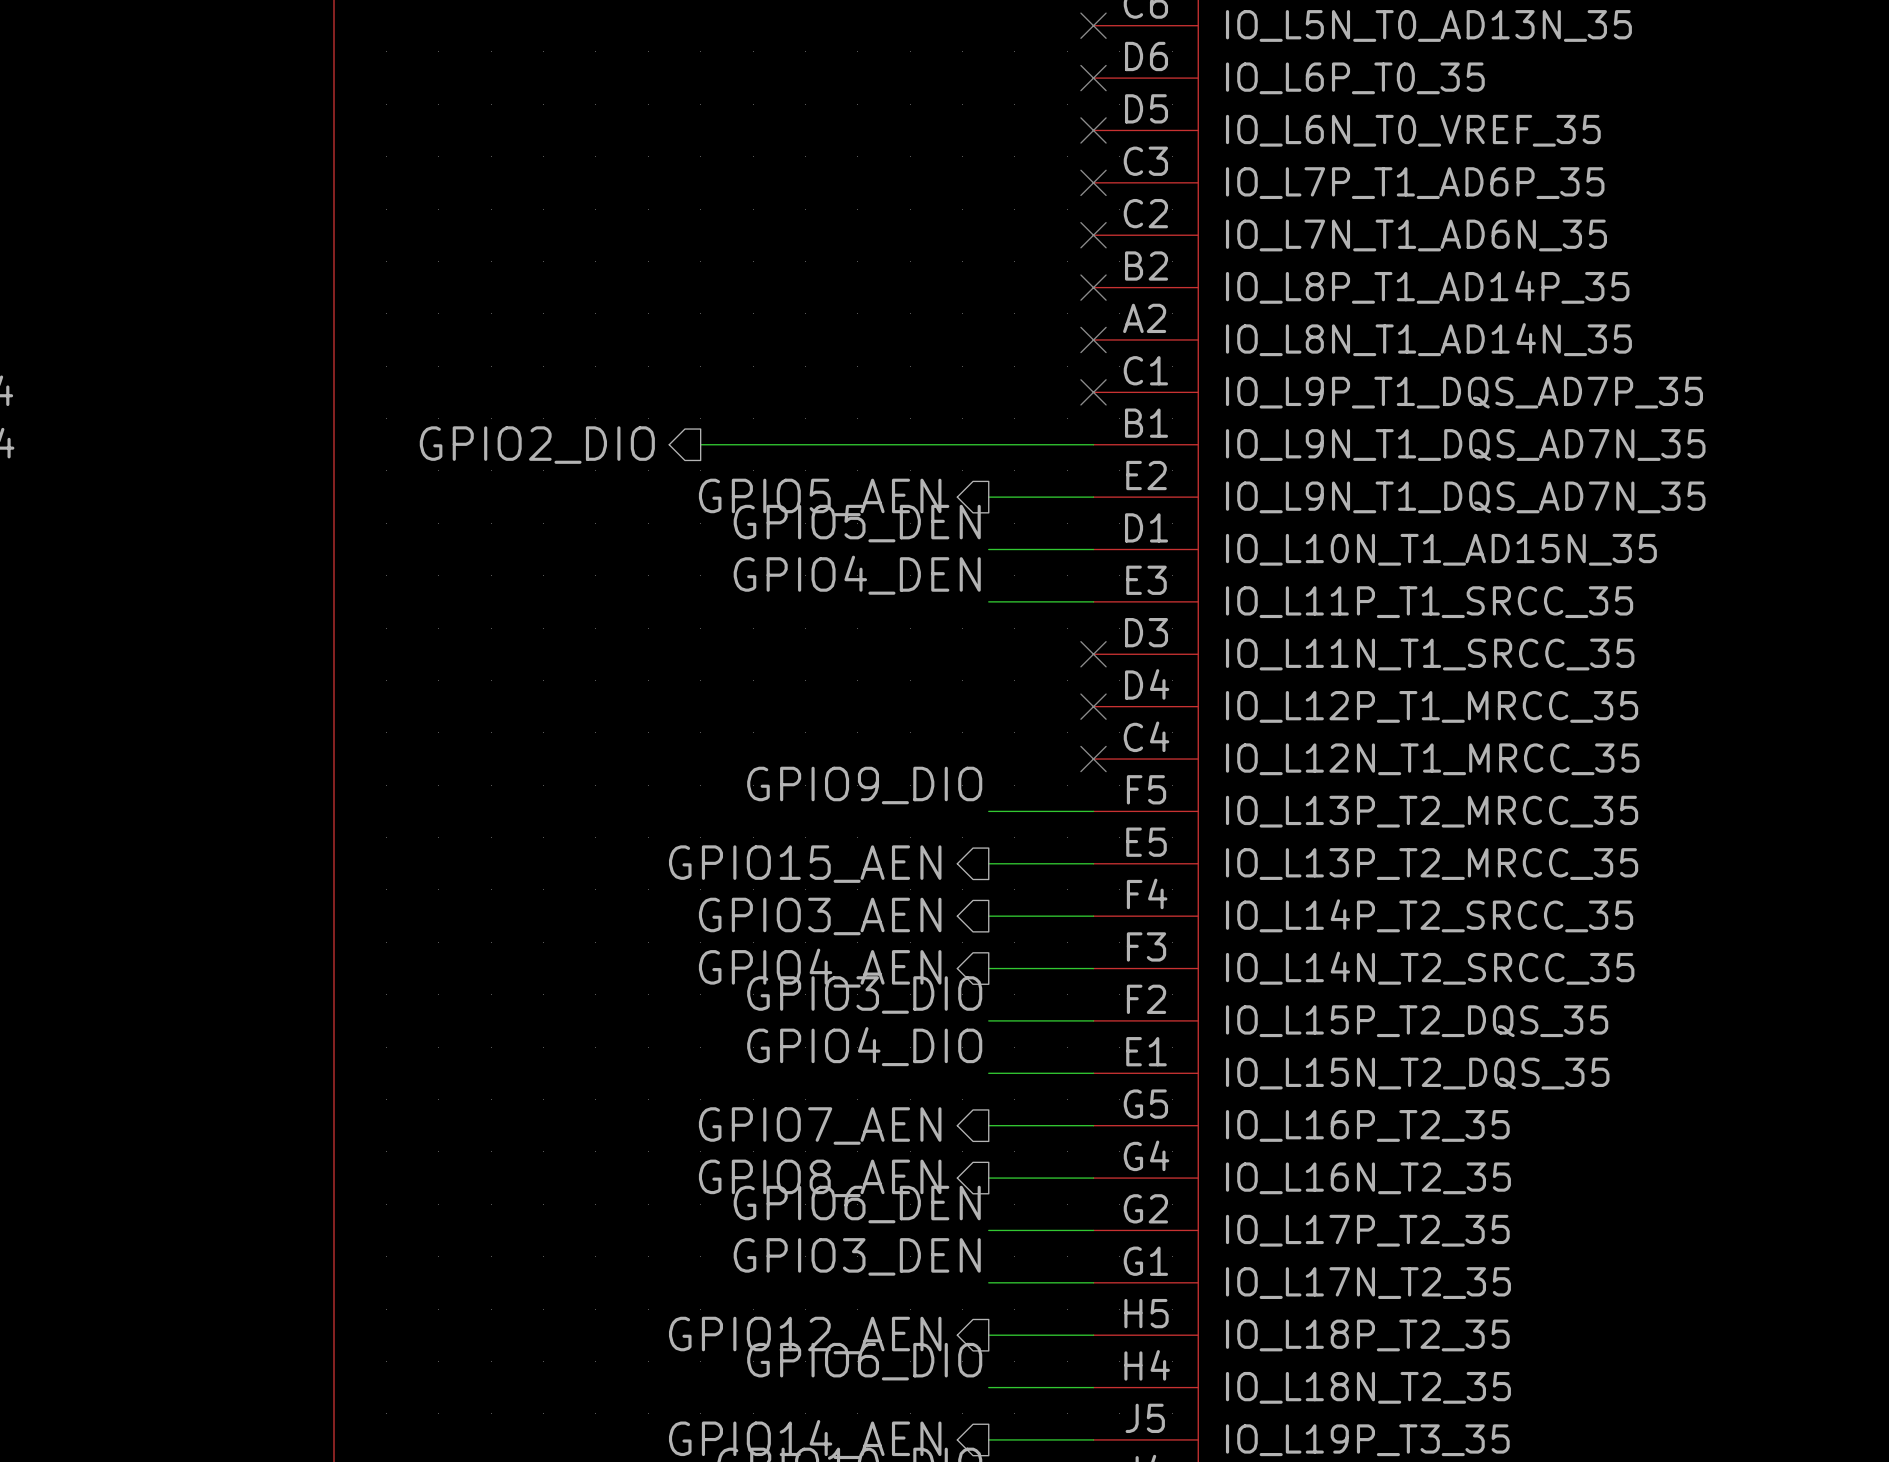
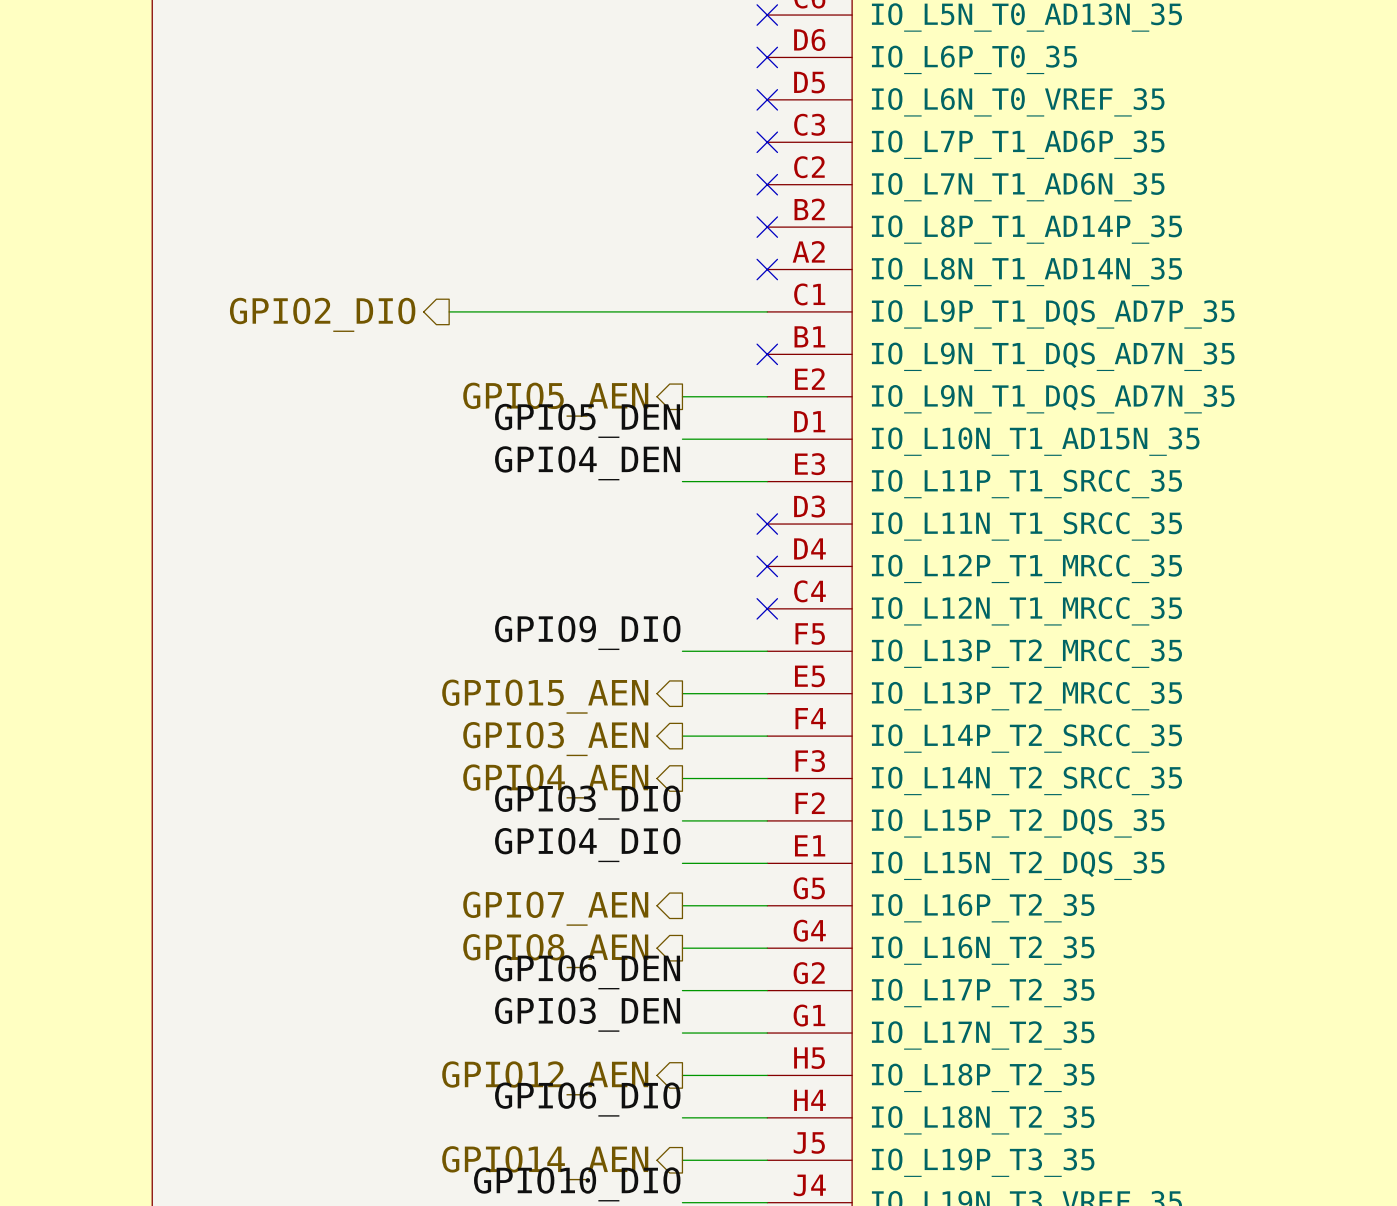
no-connect mark position: (1093, 392) -> (767, 354)
wire: (700, 444) (1093, 444) -> (449, 311) (767, 311)
hierarchical label position: GPIO2_DIO (537, 445) -> GPIO2_DIO (322, 314)

